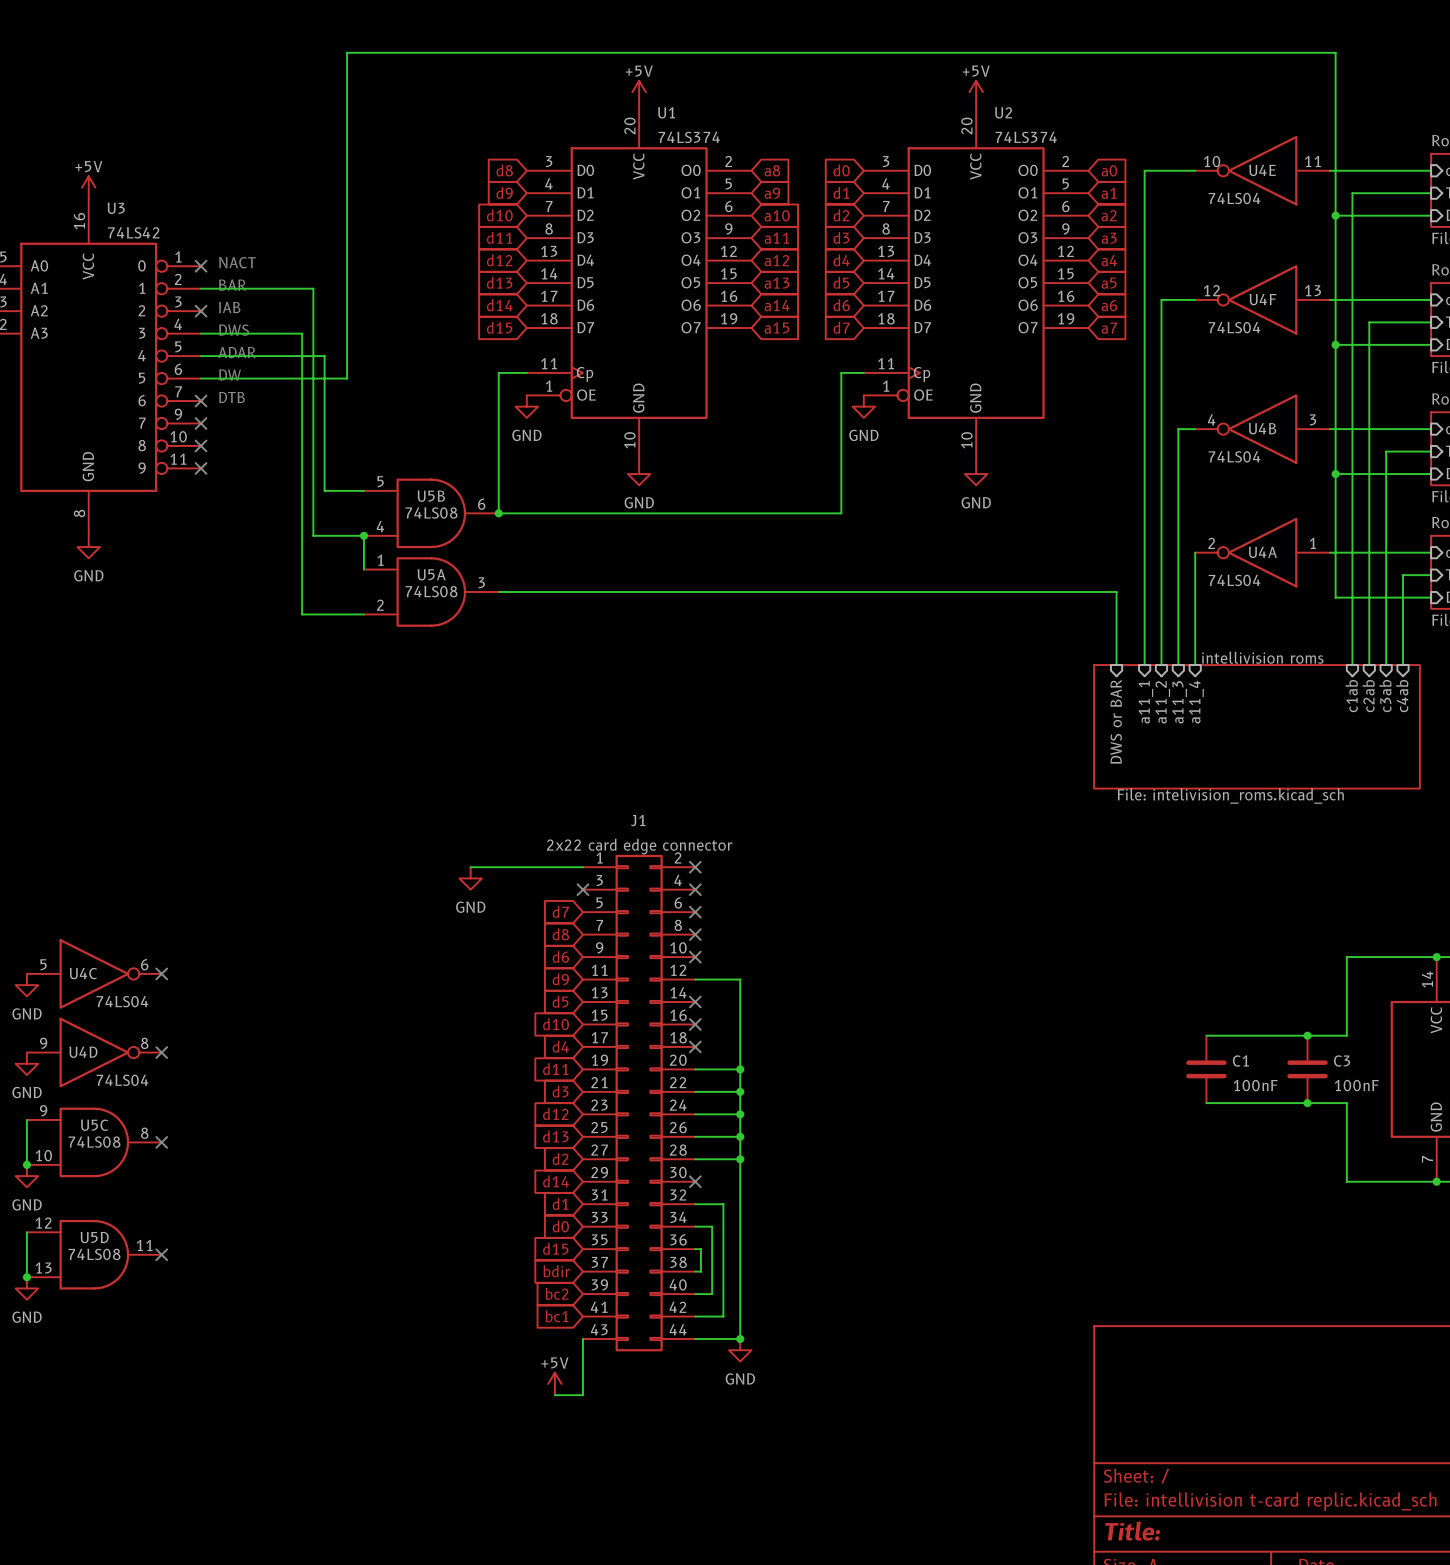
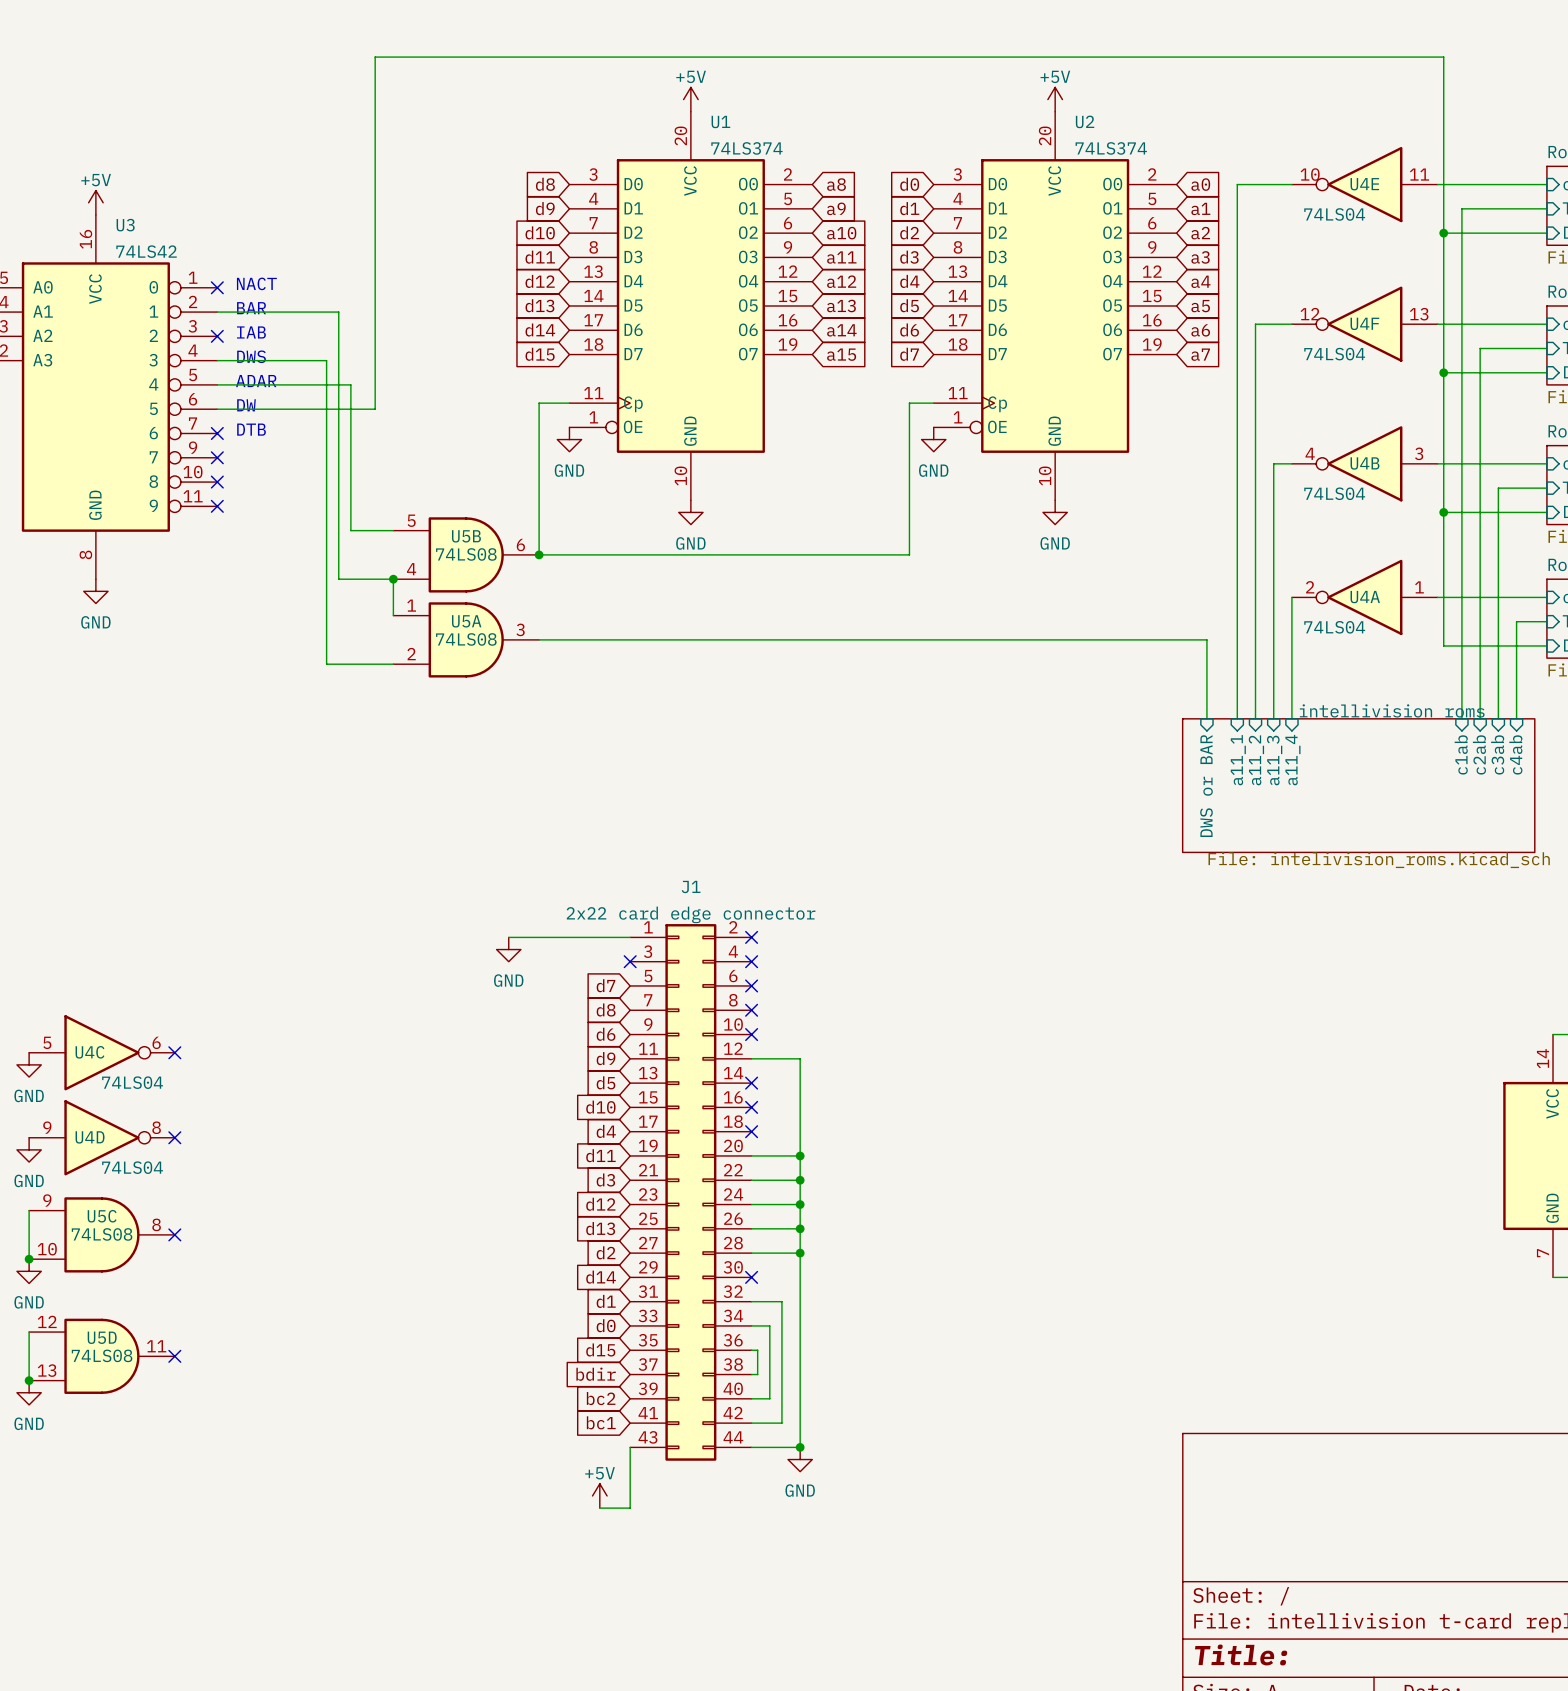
wire: (1436, 957) (1346, 957) (1346, 1035) (1206, 1035) -> none
junction: (1436, 957) -> none
junction: (1307, 1035) -> none
C1: 100nF (1206, 1069) -> none
C3: 100nF (1307, 1069) -> none
wire: (1206, 1103) (1346, 1103) (1346, 1181) (1436, 1181) -> none
junction: (1307, 1103) -> none
junction: (1436, 1181) -> none

